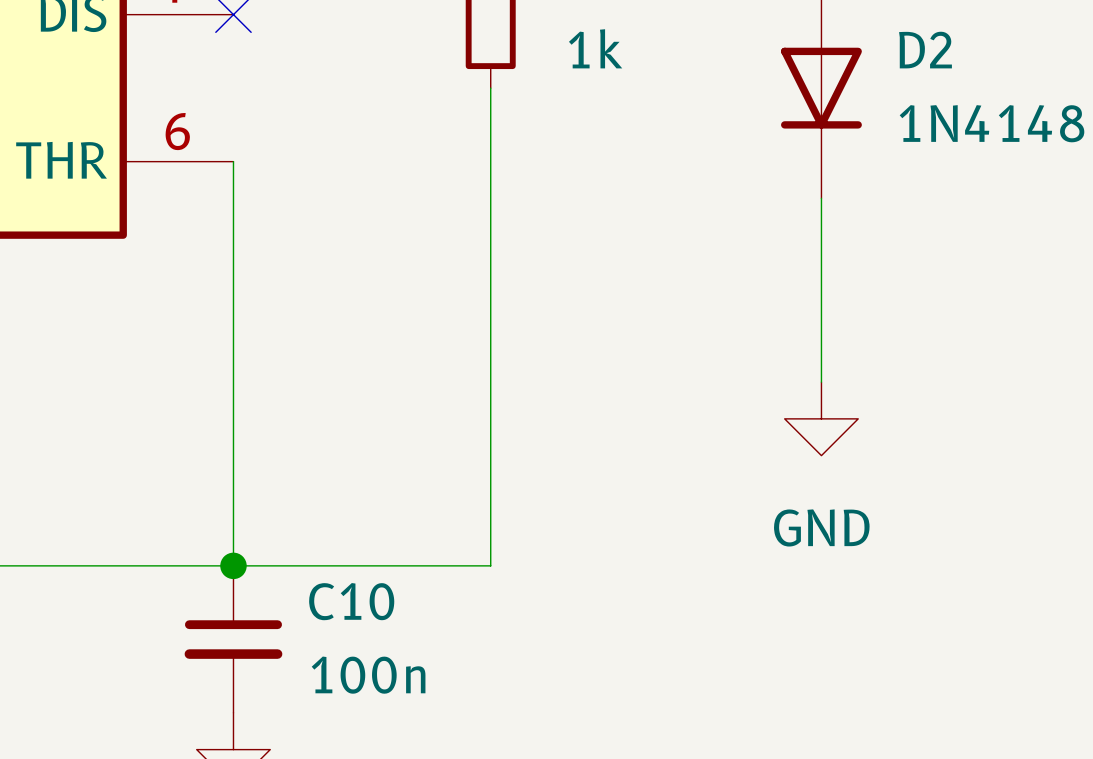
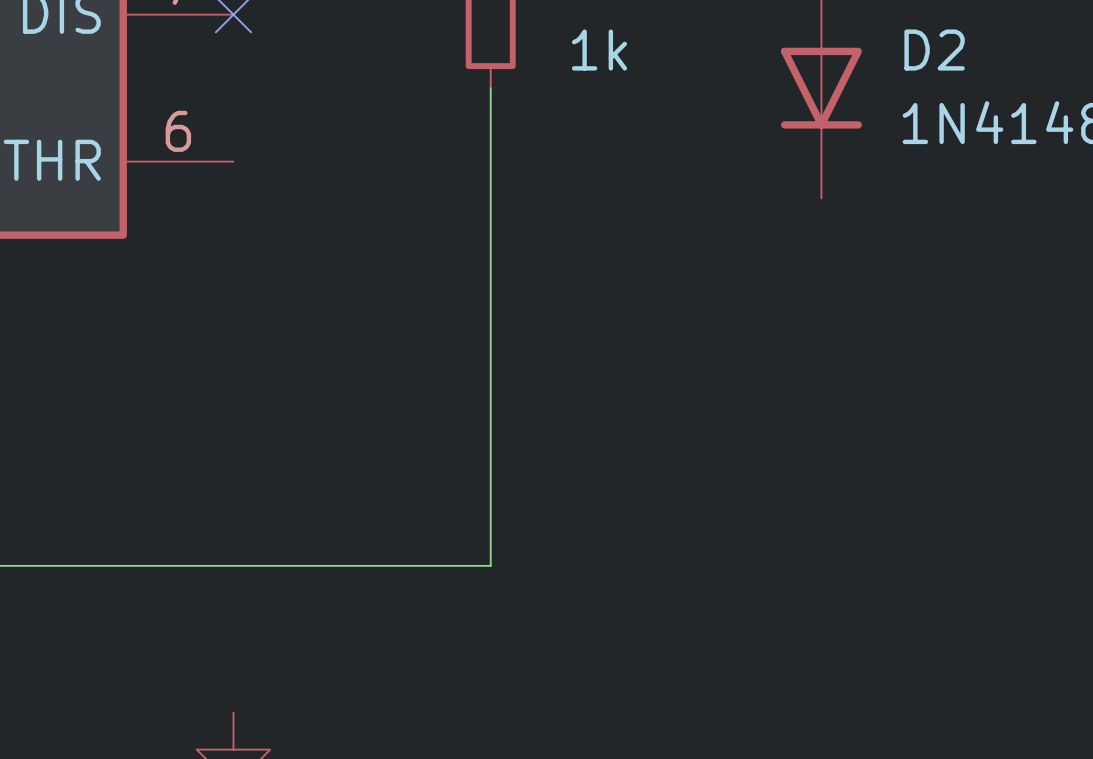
wire: (233, 161) (233, 565) -> none
wire: (821, 198) (821, 382) -> none
power symbol: GND (821, 418) -> none
junction: (233, 565) -> none
C10: 100n (233, 639) -> none

